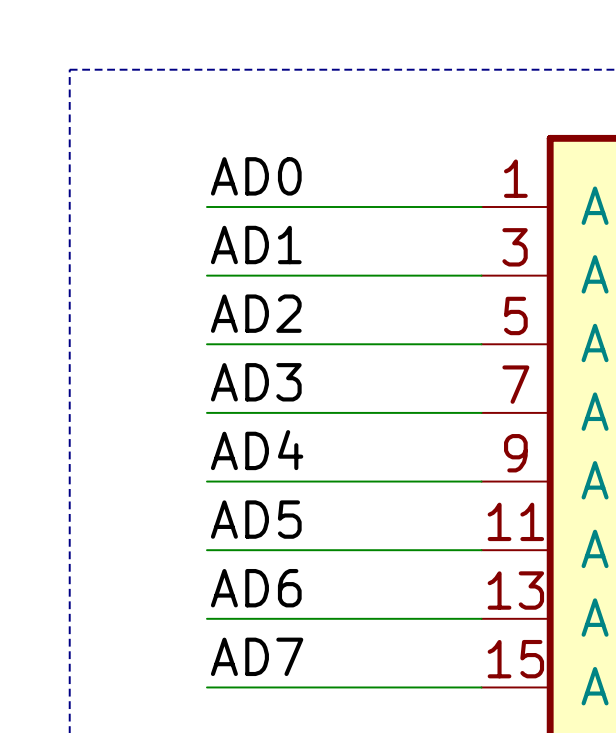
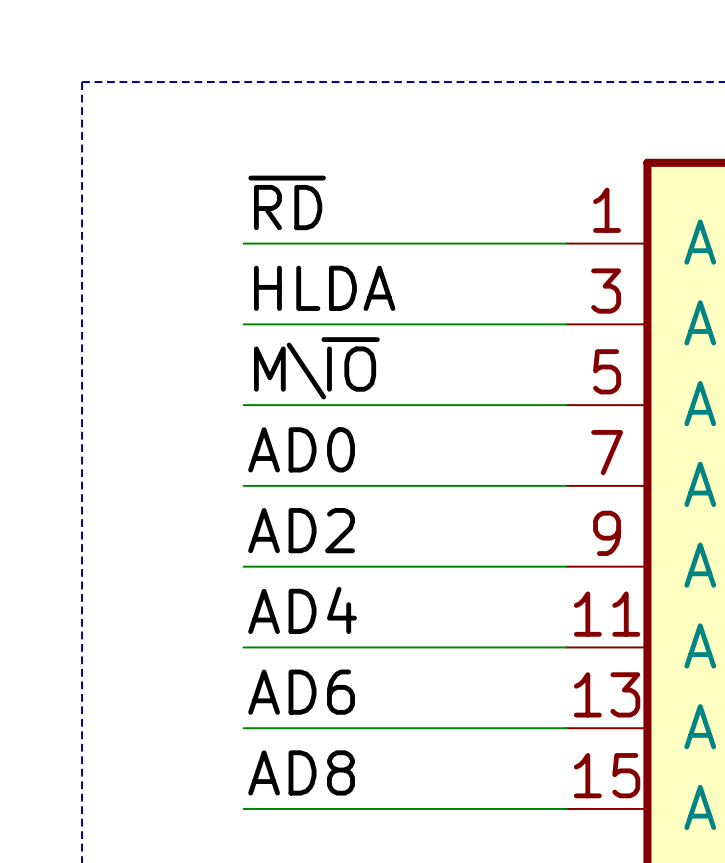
label: AD0 (256, 176) -> ~{RD} (287, 202)
label: AD1 (256, 245) -> HLDA (324, 288)
label: AD2 (256, 313) -> M\~{IO} (316, 368)
label: AD3 (256, 382) -> AD0 (301, 449)
label: AD4 (257, 450) -> AD2 (301, 530)
label: AD5 (256, 519) -> AD4 (302, 610)
label: AD7 (257, 656) -> AD8 (301, 772)

